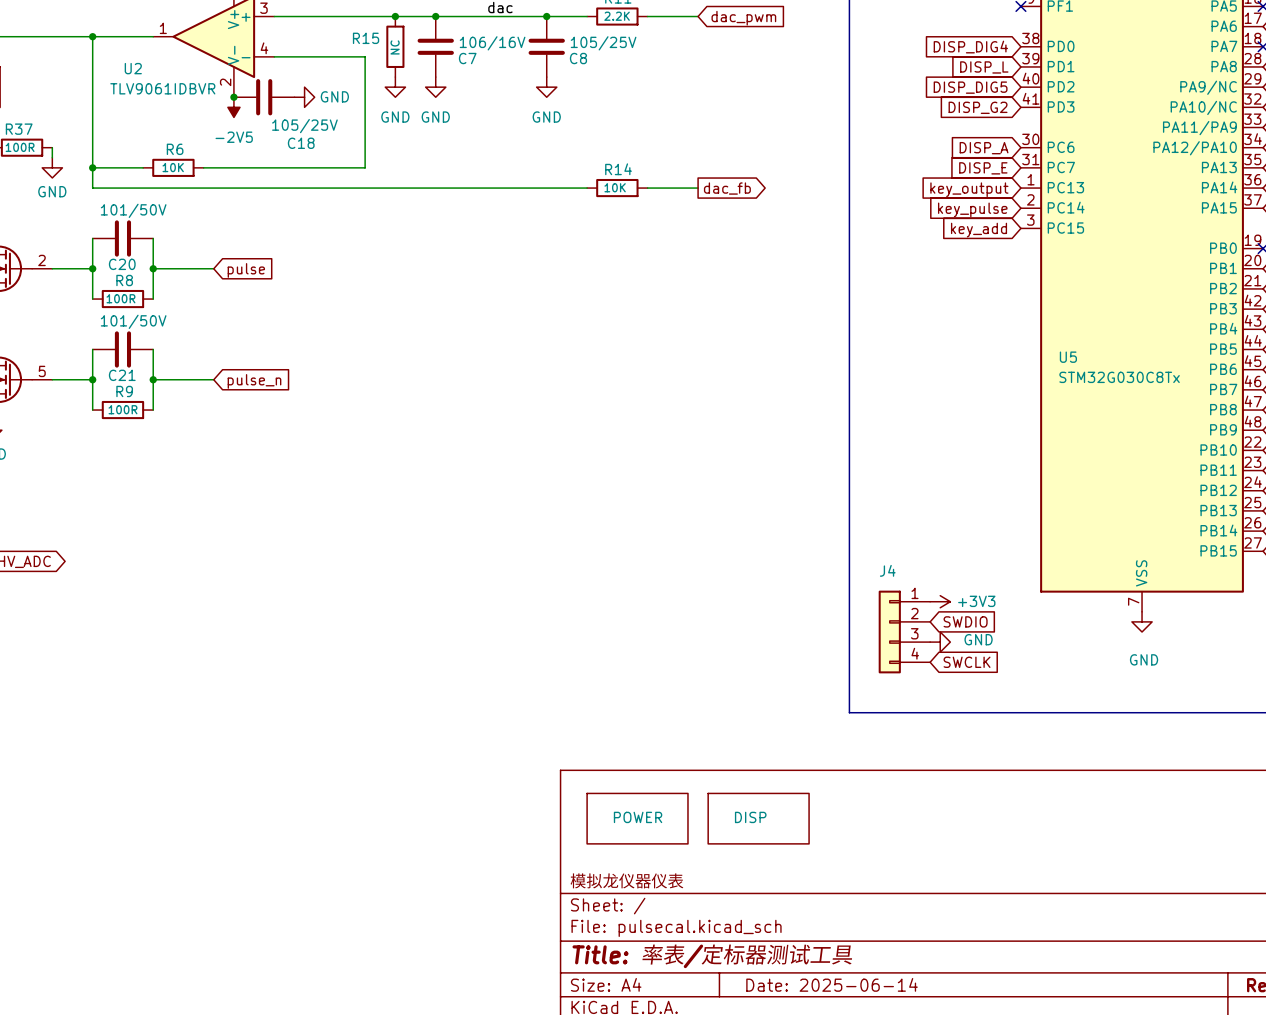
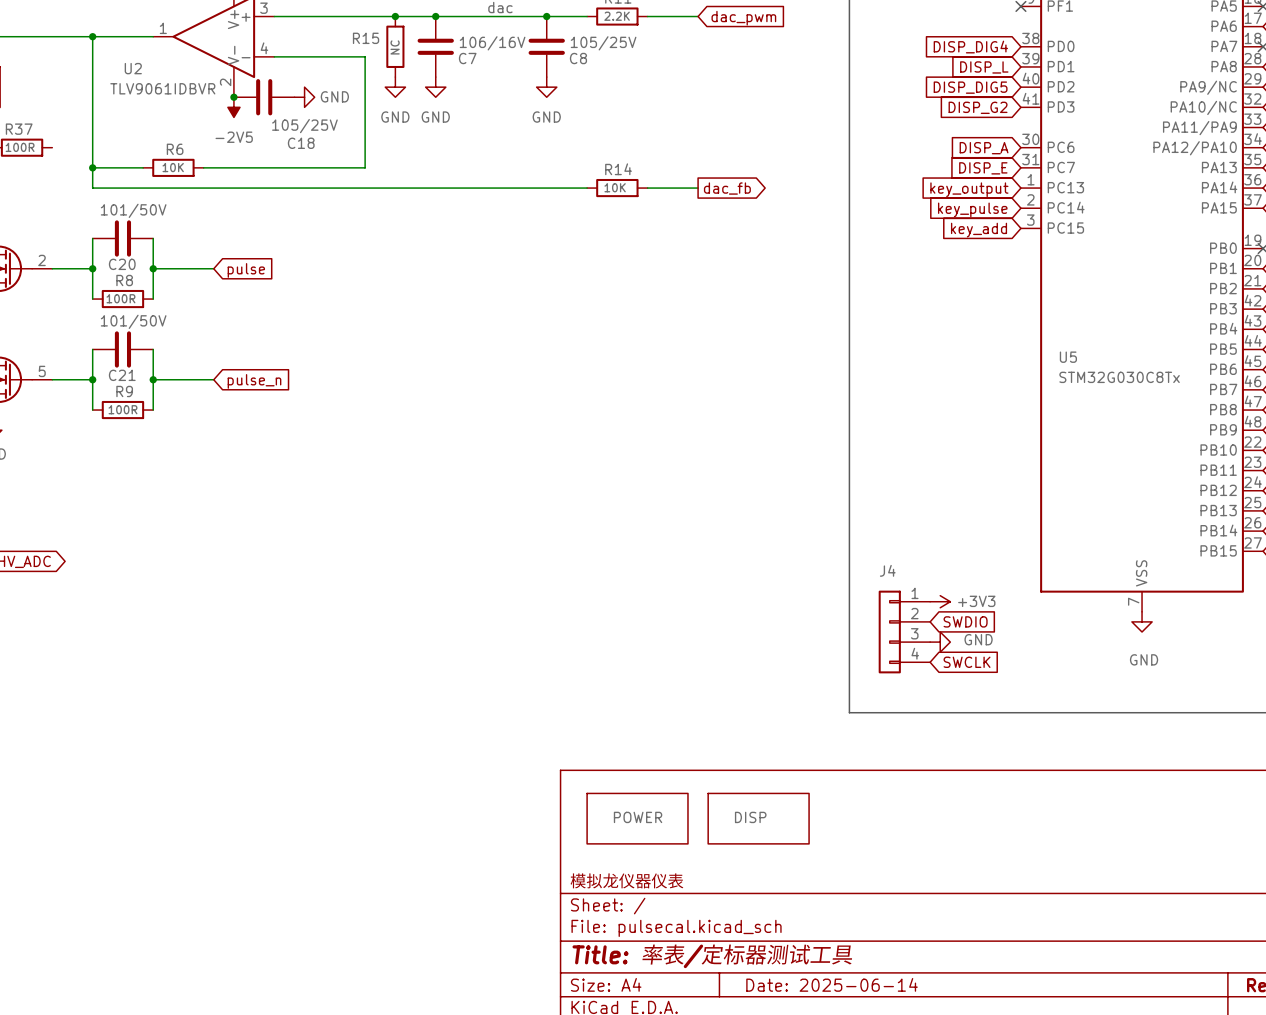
wire: (52, 147) (52, 157) -> none
power symbol: GND (52, 167) -> none

